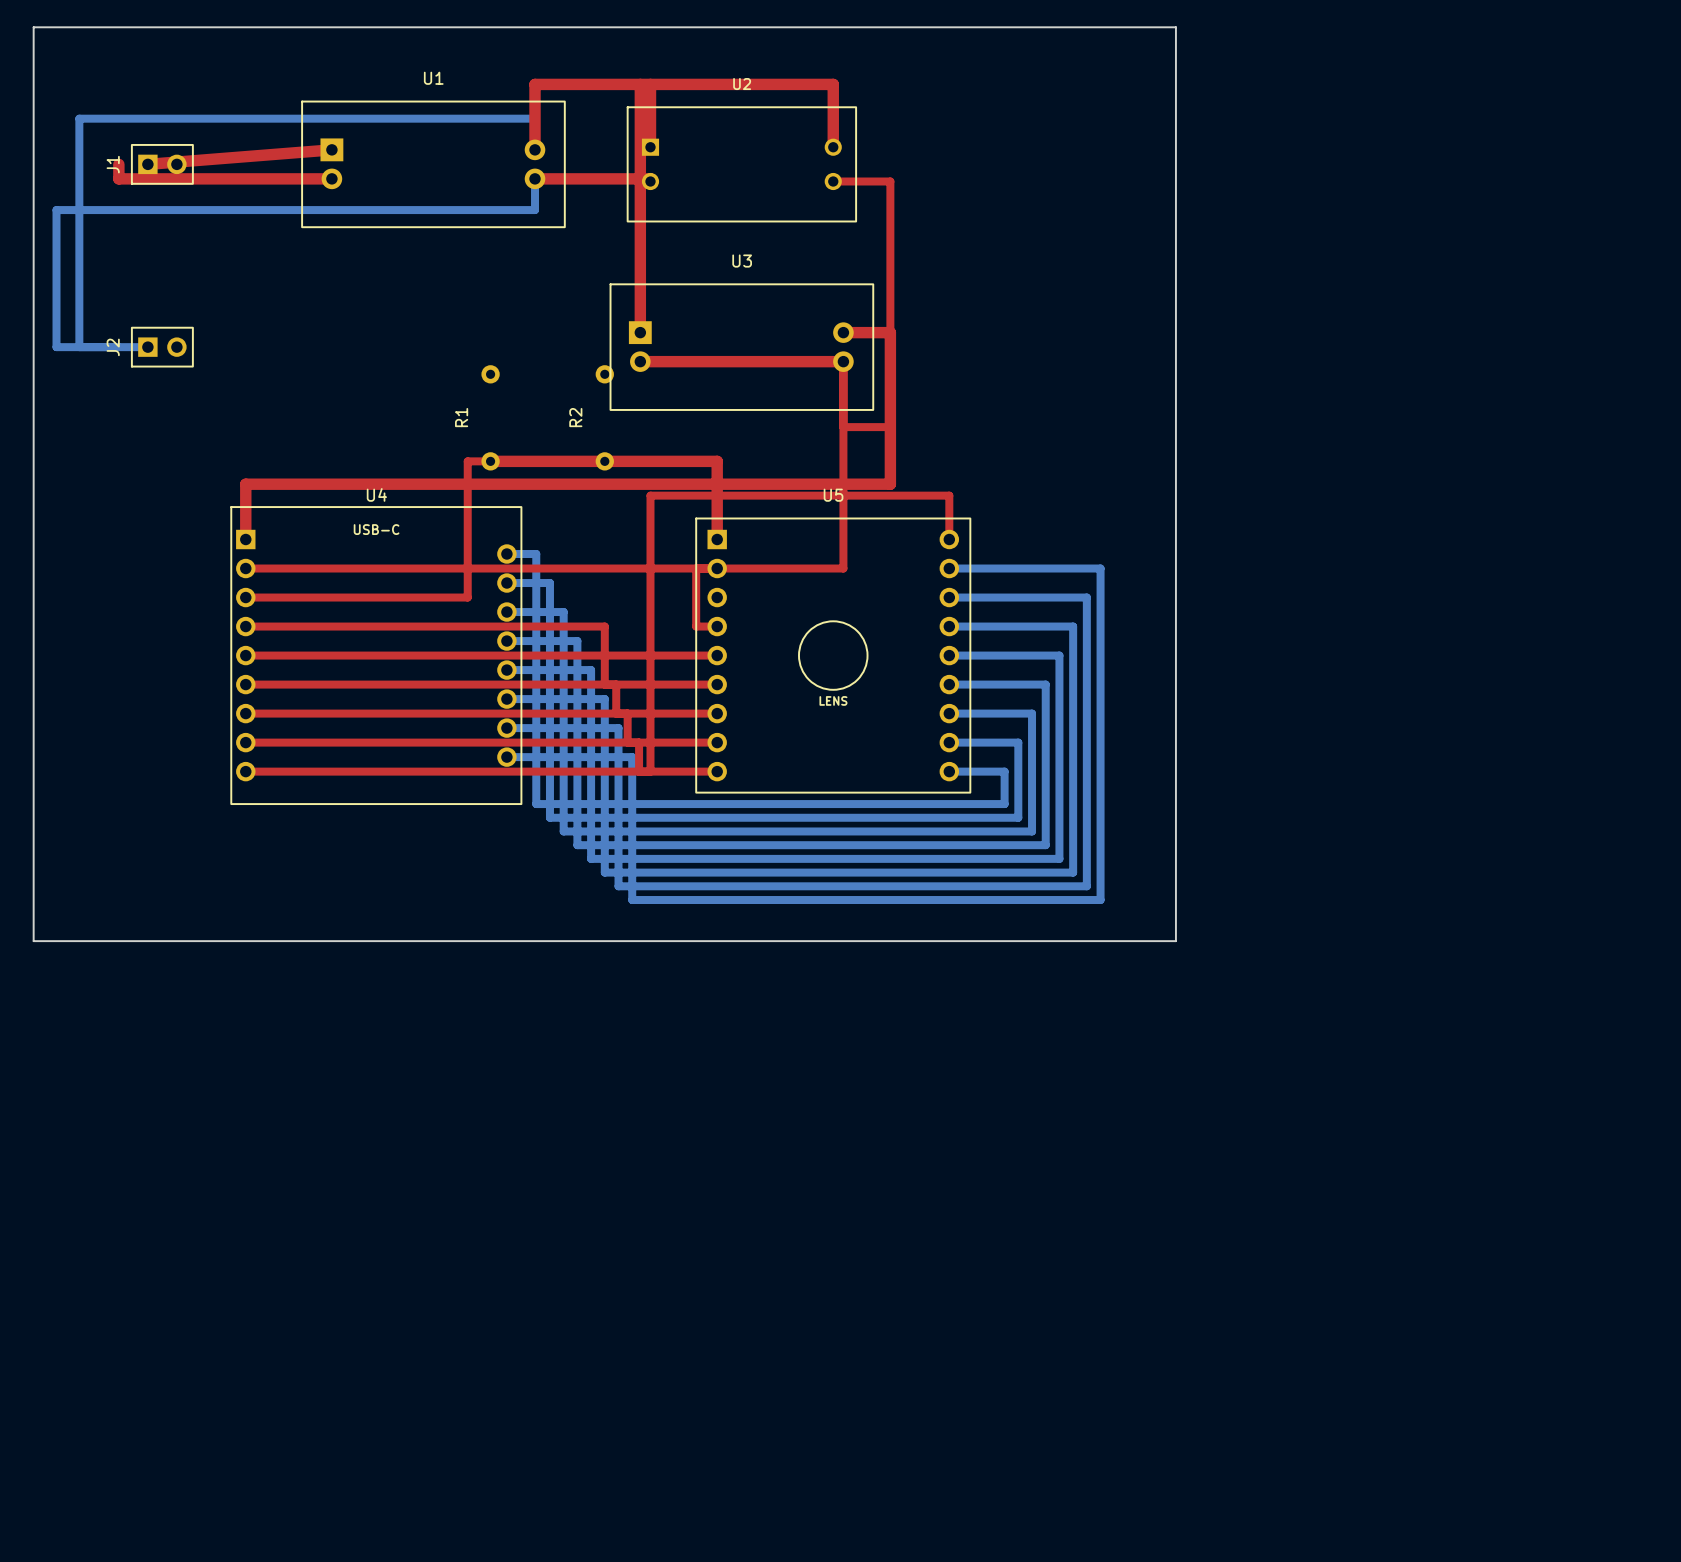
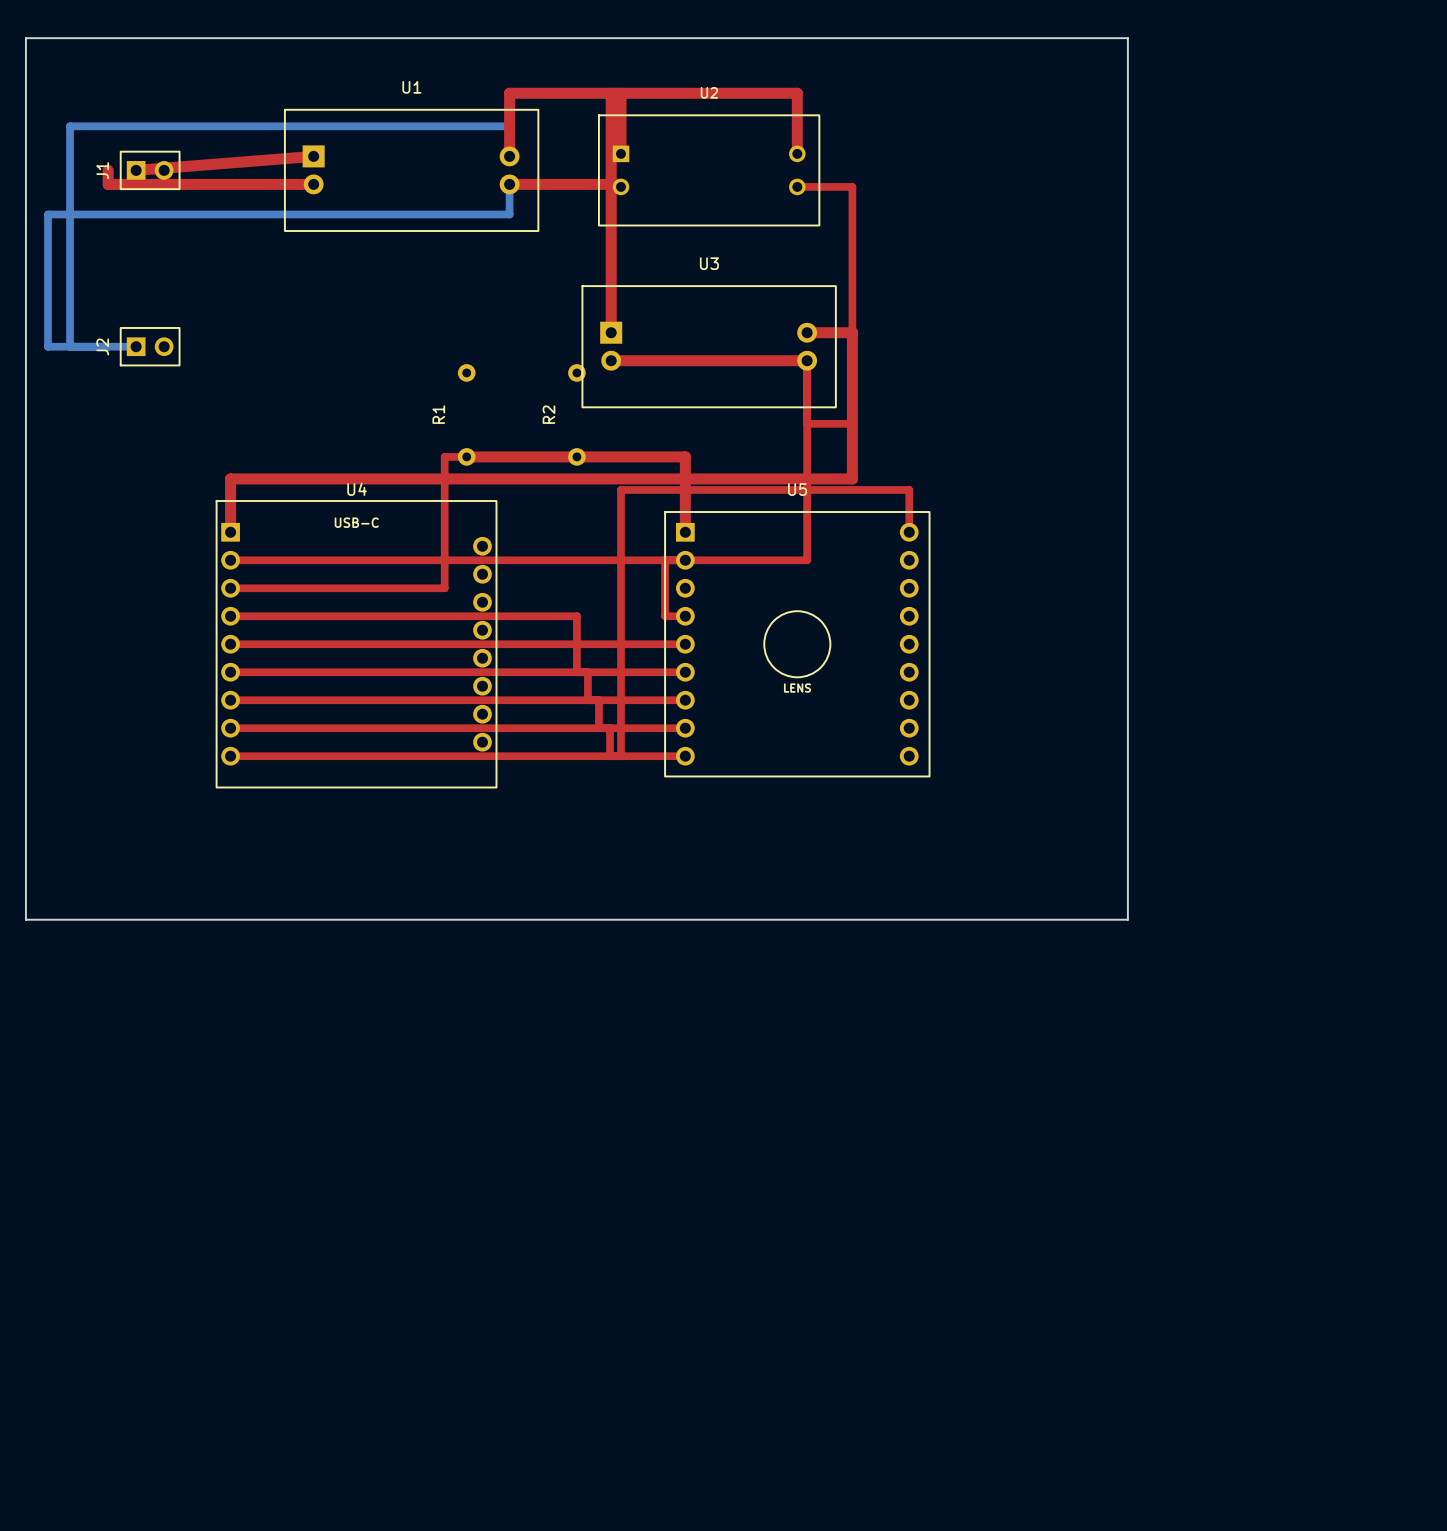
bottom track: (506, 554) (536, 554) (536, 804) (1004, 804) (1004, 771) (949, 771) -> none
bottom track: (949, 568) (1100, 568) (1100, 900) (632, 900) (632, 757) (506, 757) -> none
bottom track: (506, 583) (549, 583) (549, 817) (1018, 817) (1018, 742) (949, 742) -> none
bottom track: (949, 597) (1086, 597) (1086, 886) (618, 886) (618, 728) (506, 728) -> none
bottom track: (506, 612) (563, 612) (563, 831) (1032, 831) (1032, 713) (949, 713) -> none
bottom track: (949, 626) (1073, 626) (1073, 872) (604, 872) (604, 699) (506, 699) -> none
bottom track: (506, 641) (577, 641) (577, 845) (1045, 845) (1045, 684) (949, 684) -> none
bottom track: (949, 655) (1059, 655) (1059, 858) (591, 858) (591, 670) (506, 670) -> none

